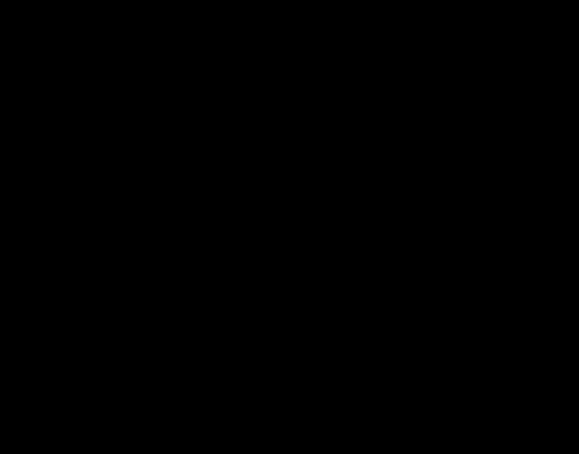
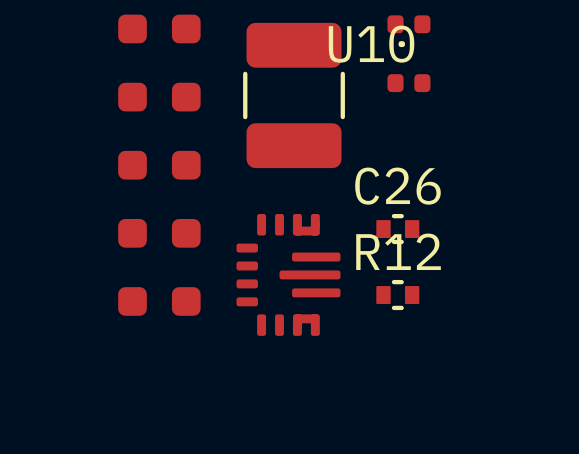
part: none -> (408, 24)
part: none -> (159, 28)
part: none -> (408, 83)
part: none -> (294, 95)
part: none -> (159, 97)
part: none -> (159, 165)
C26: none -> (397, 229)
part: none -> (159, 233)
U10: none -> (288, 274)
R12: none -> (397, 295)
part: none -> (159, 301)

